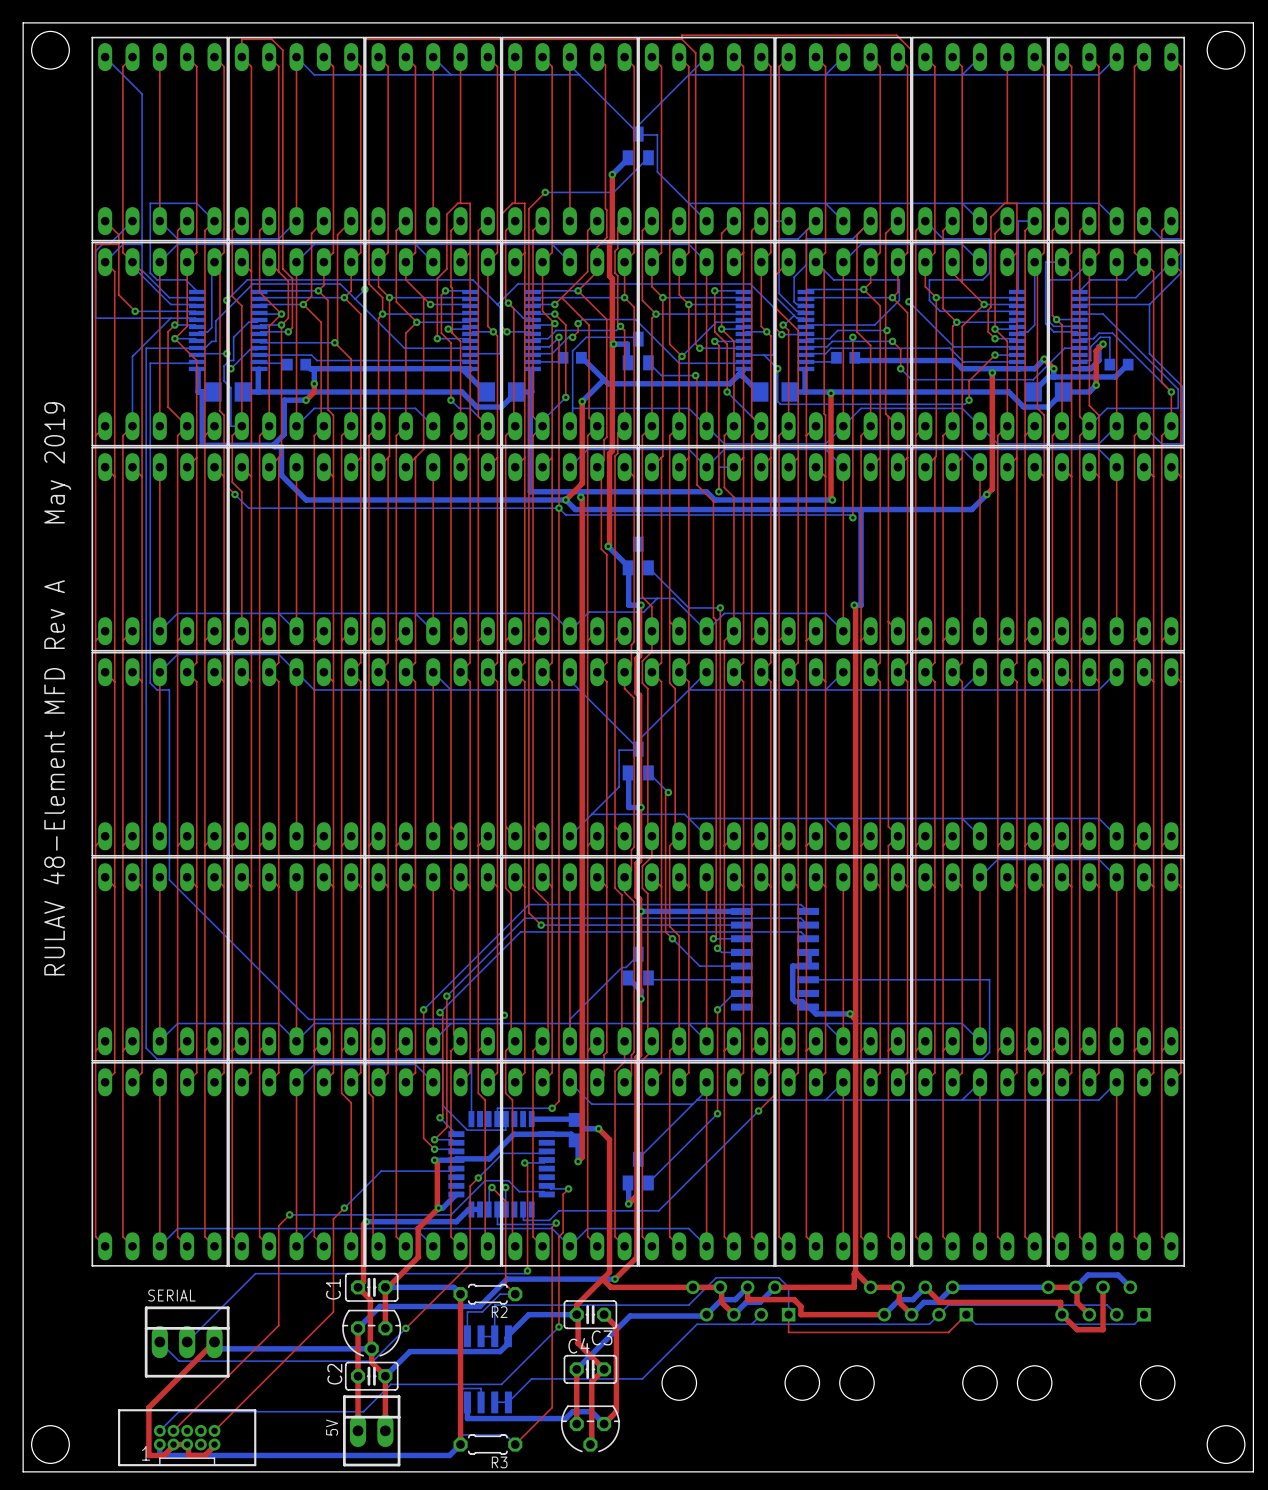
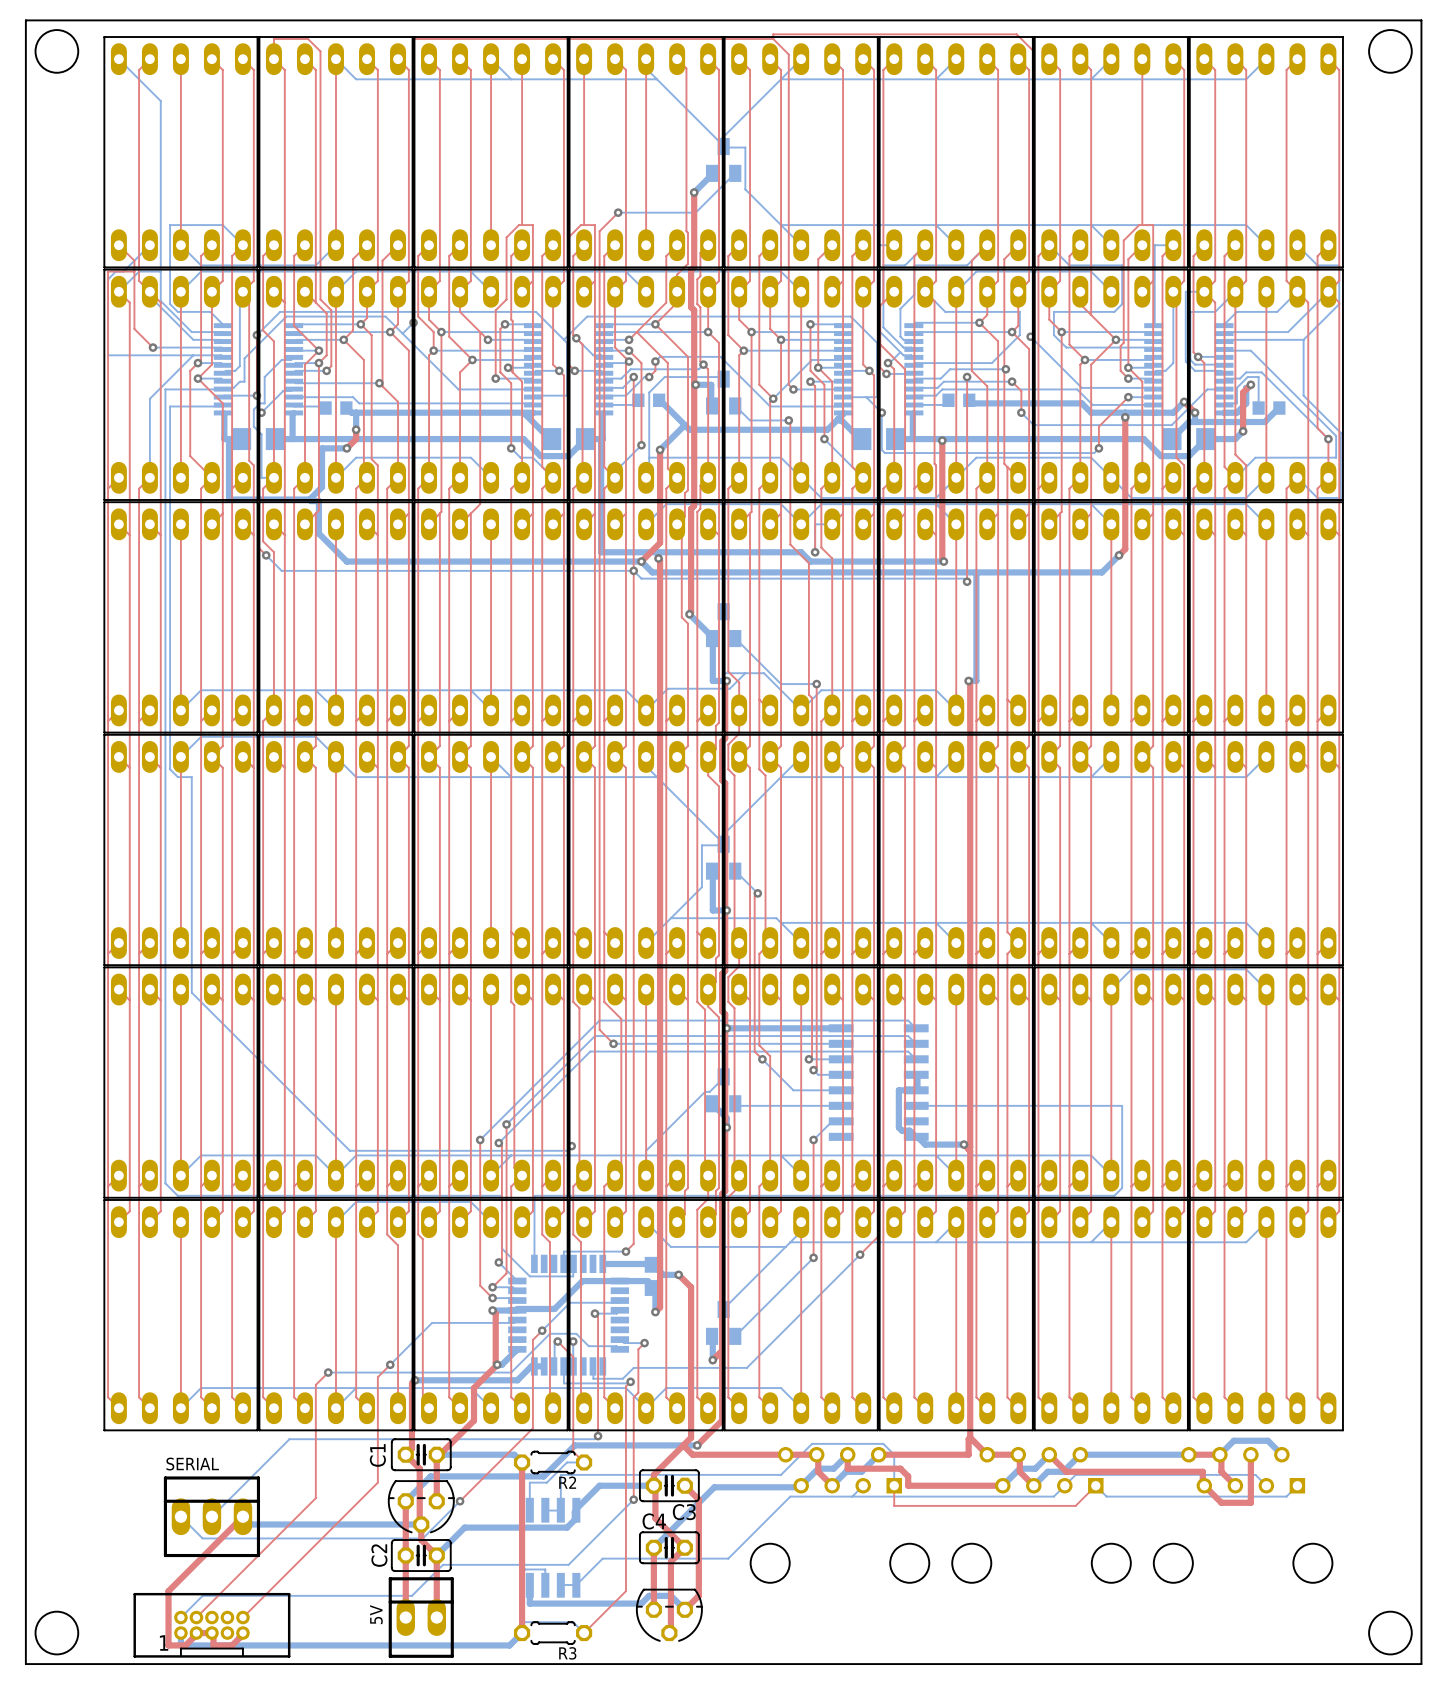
text: RULAV 48-Element MFD Rev A May 2019 (57, 688) -> none

